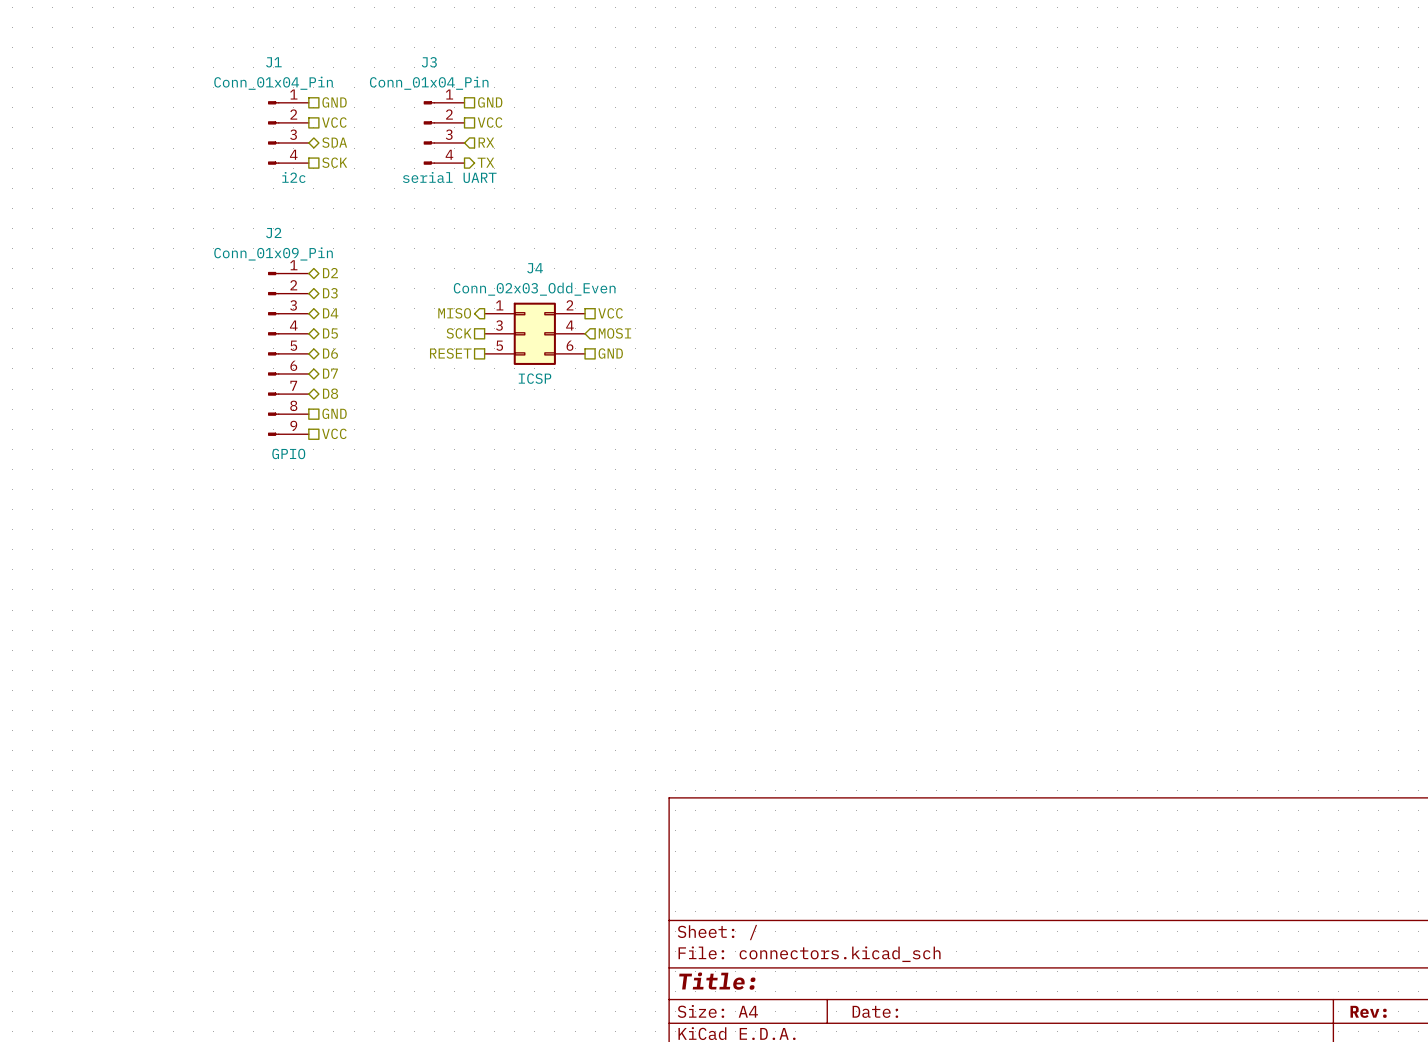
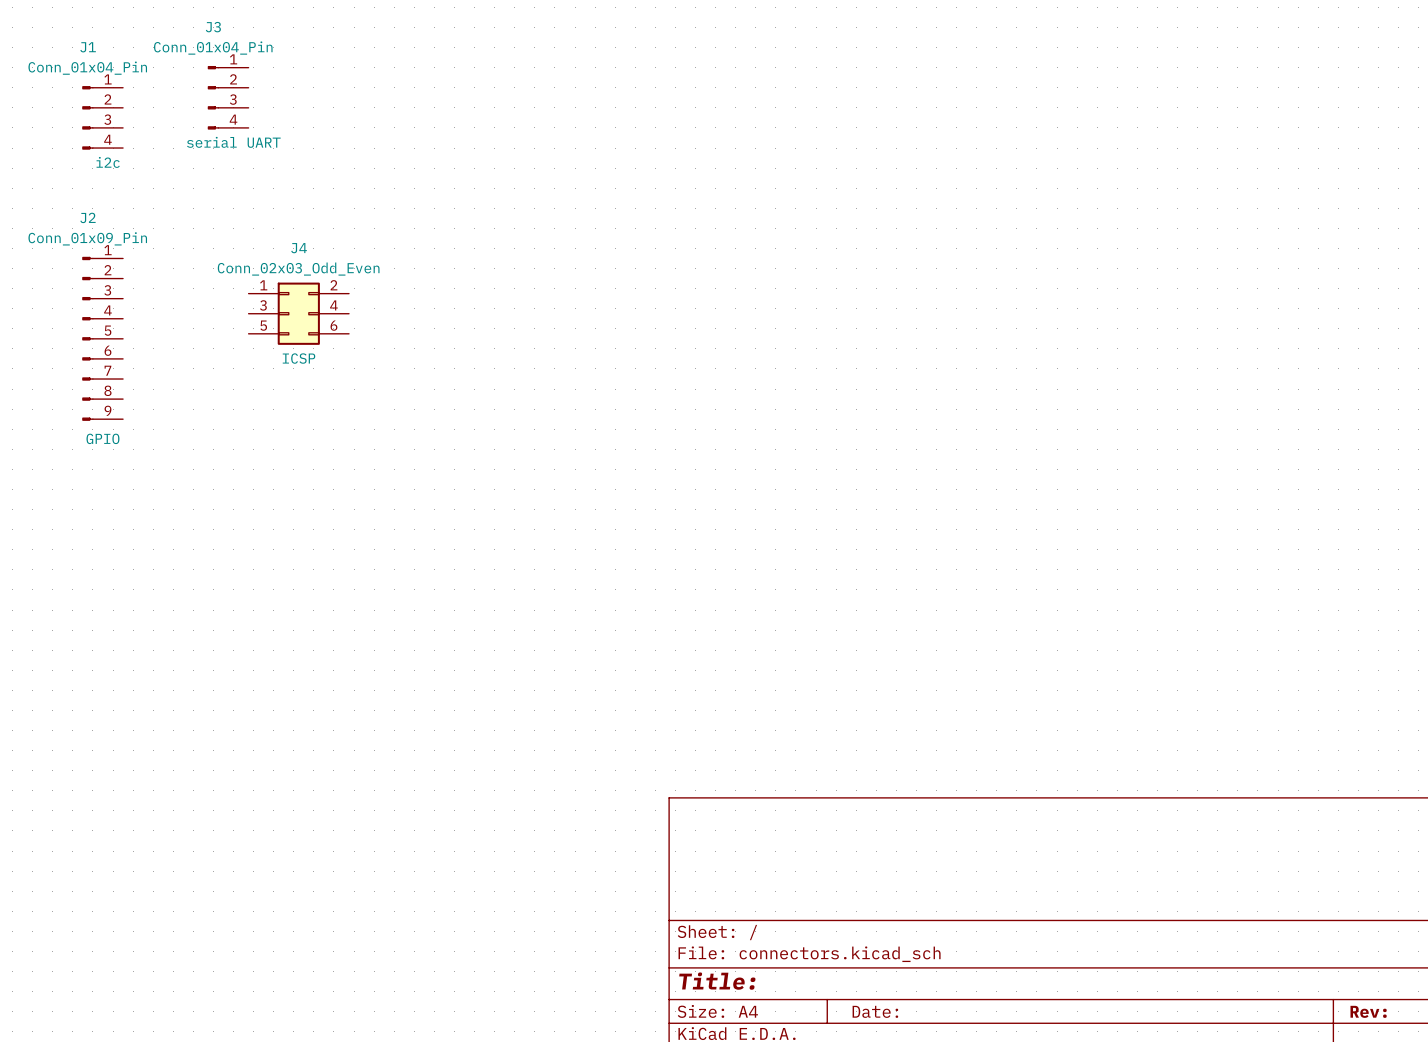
hierarchical label: GND (334, 102) -> none
hierarchical label: GND (490, 102) -> none
hierarchical label: VCC (334, 122) -> none
hierarchical label: VCC (490, 122) -> none
J1 position: (288, 132) -> (102, 117)
J3 position: (444, 132) -> (228, 97)
hierarchical label: SDA (334, 142) -> none
hierarchical label: RX (486, 142) -> none
hierarchical label: SCK (334, 162) -> none
hierarchical label: TX (485, 162) -> none
hierarchical label: D2 (330, 273) -> none
hierarchical label: D3 (330, 293) -> none
hierarchical label: D4 (330, 313) -> none
hierarchical label: MISO (454, 313) -> none
hierarchical label: VCC (610, 313) -> none
hierarchical label: D5 (330, 333) -> none
hierarchical label: SCK (459, 333) -> none
J4 position: (534, 333) -> (298, 313)
hierarchical label: MOSI (614, 333) -> none
J2 position: (288, 353) -> (102, 338)
hierarchical label: D6 (330, 353) -> none
hierarchical label: RESET (450, 353) -> none
hierarchical label: GND (610, 353) -> none
hierarchical label: D7 (330, 373) -> none
hierarchical label: D8 (330, 393) -> none
hierarchical label: GND (334, 413) -> none
hierarchical label: VCC (334, 433) -> none

